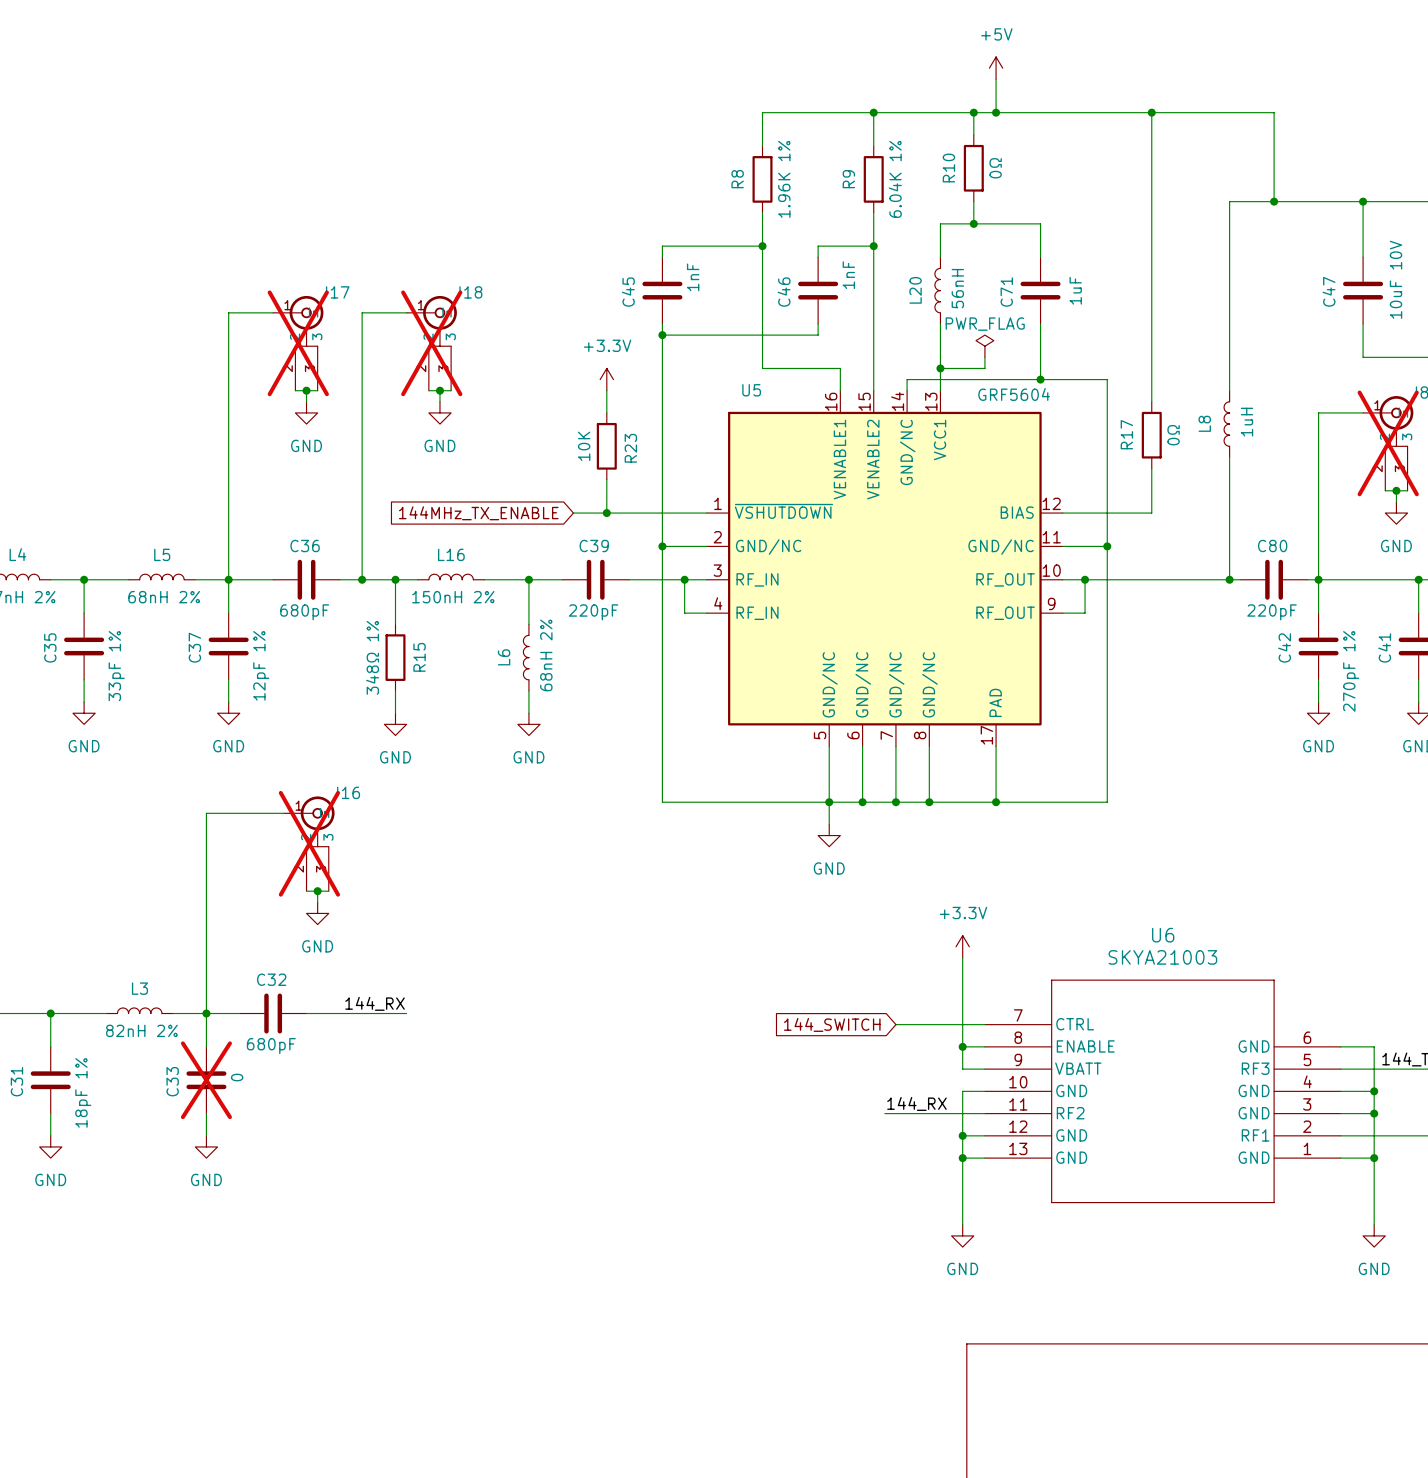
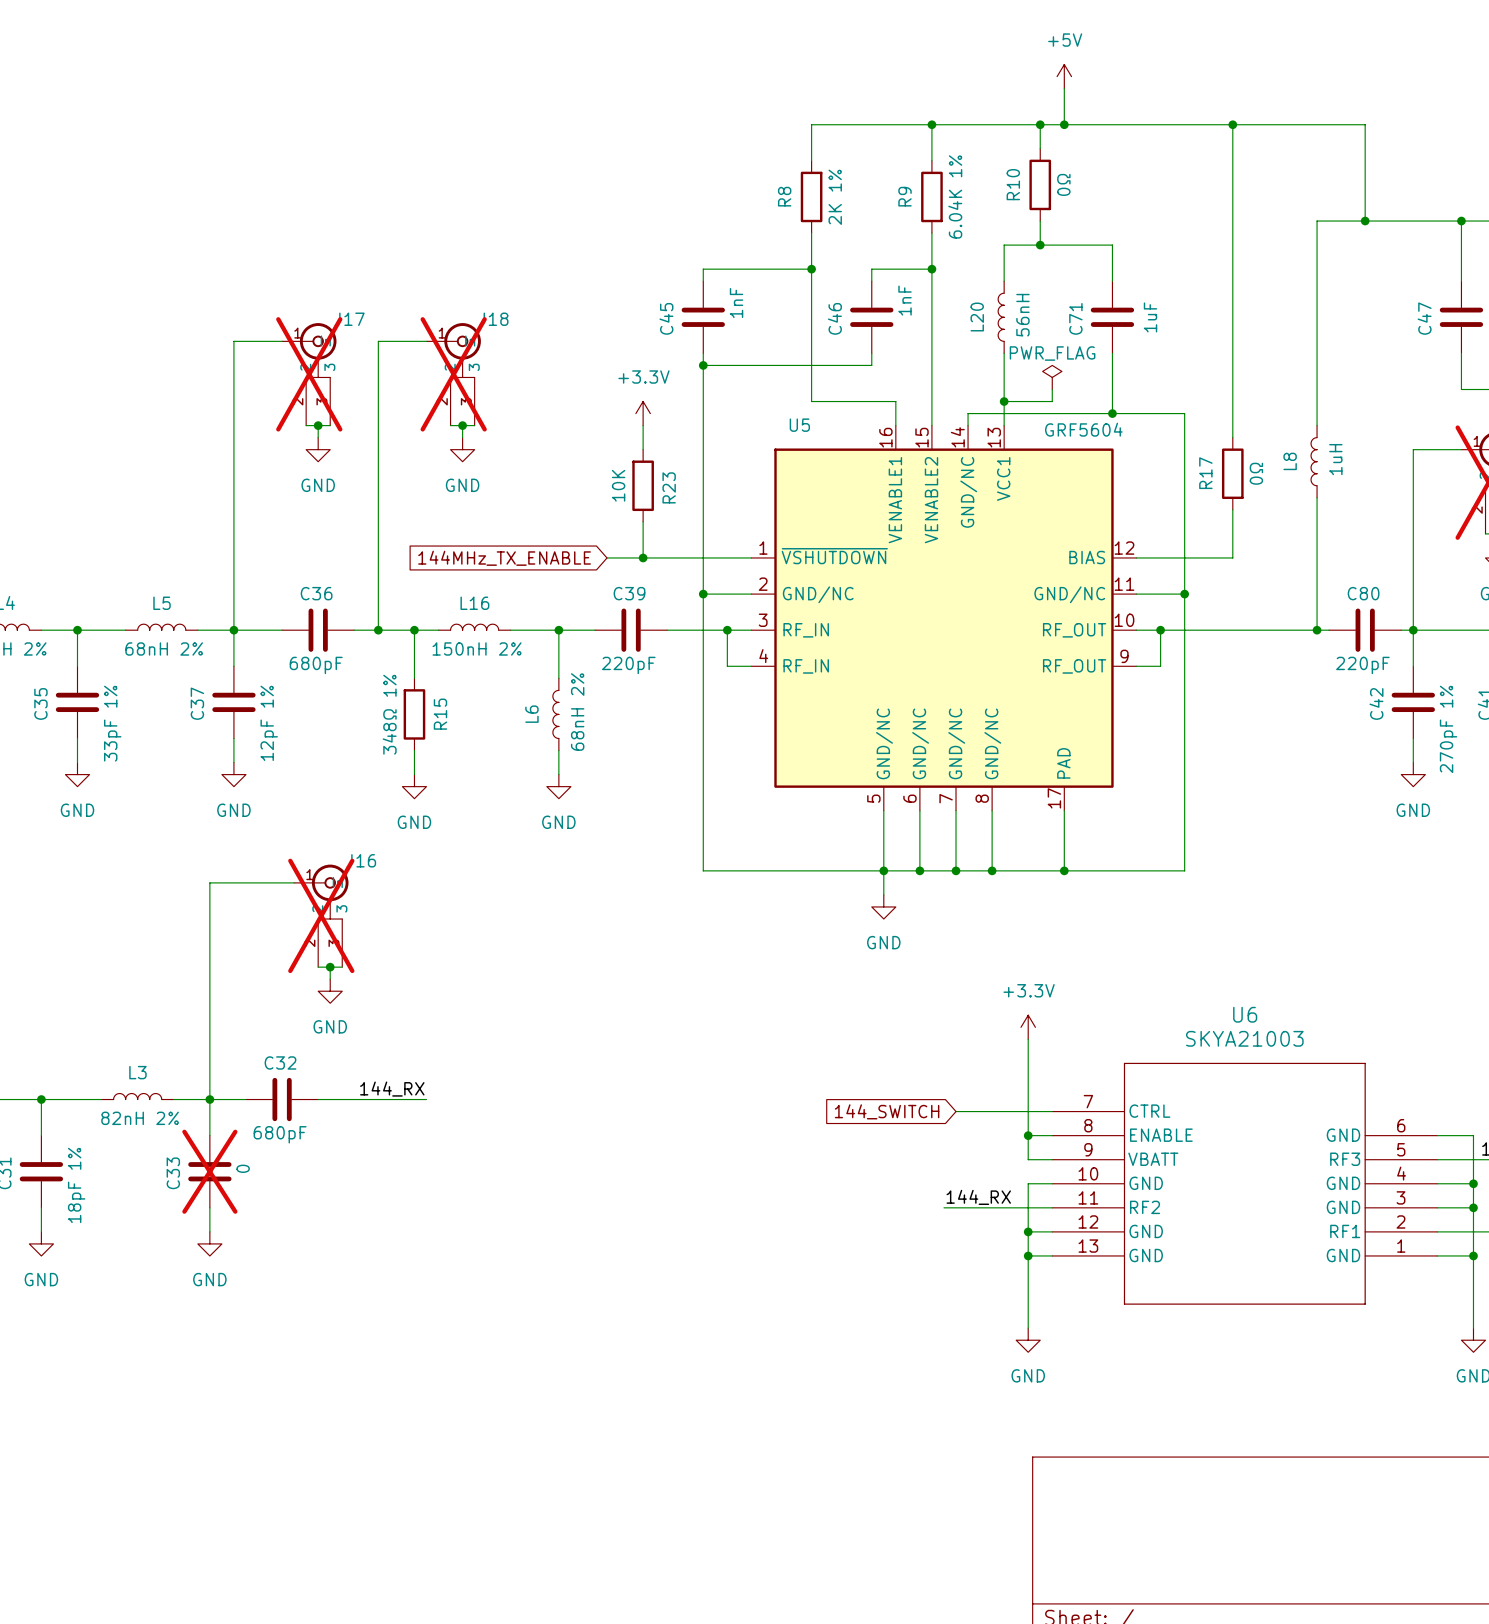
R8 value: 1.96K 1% (784, 179) -> 2K 1% (835, 197)

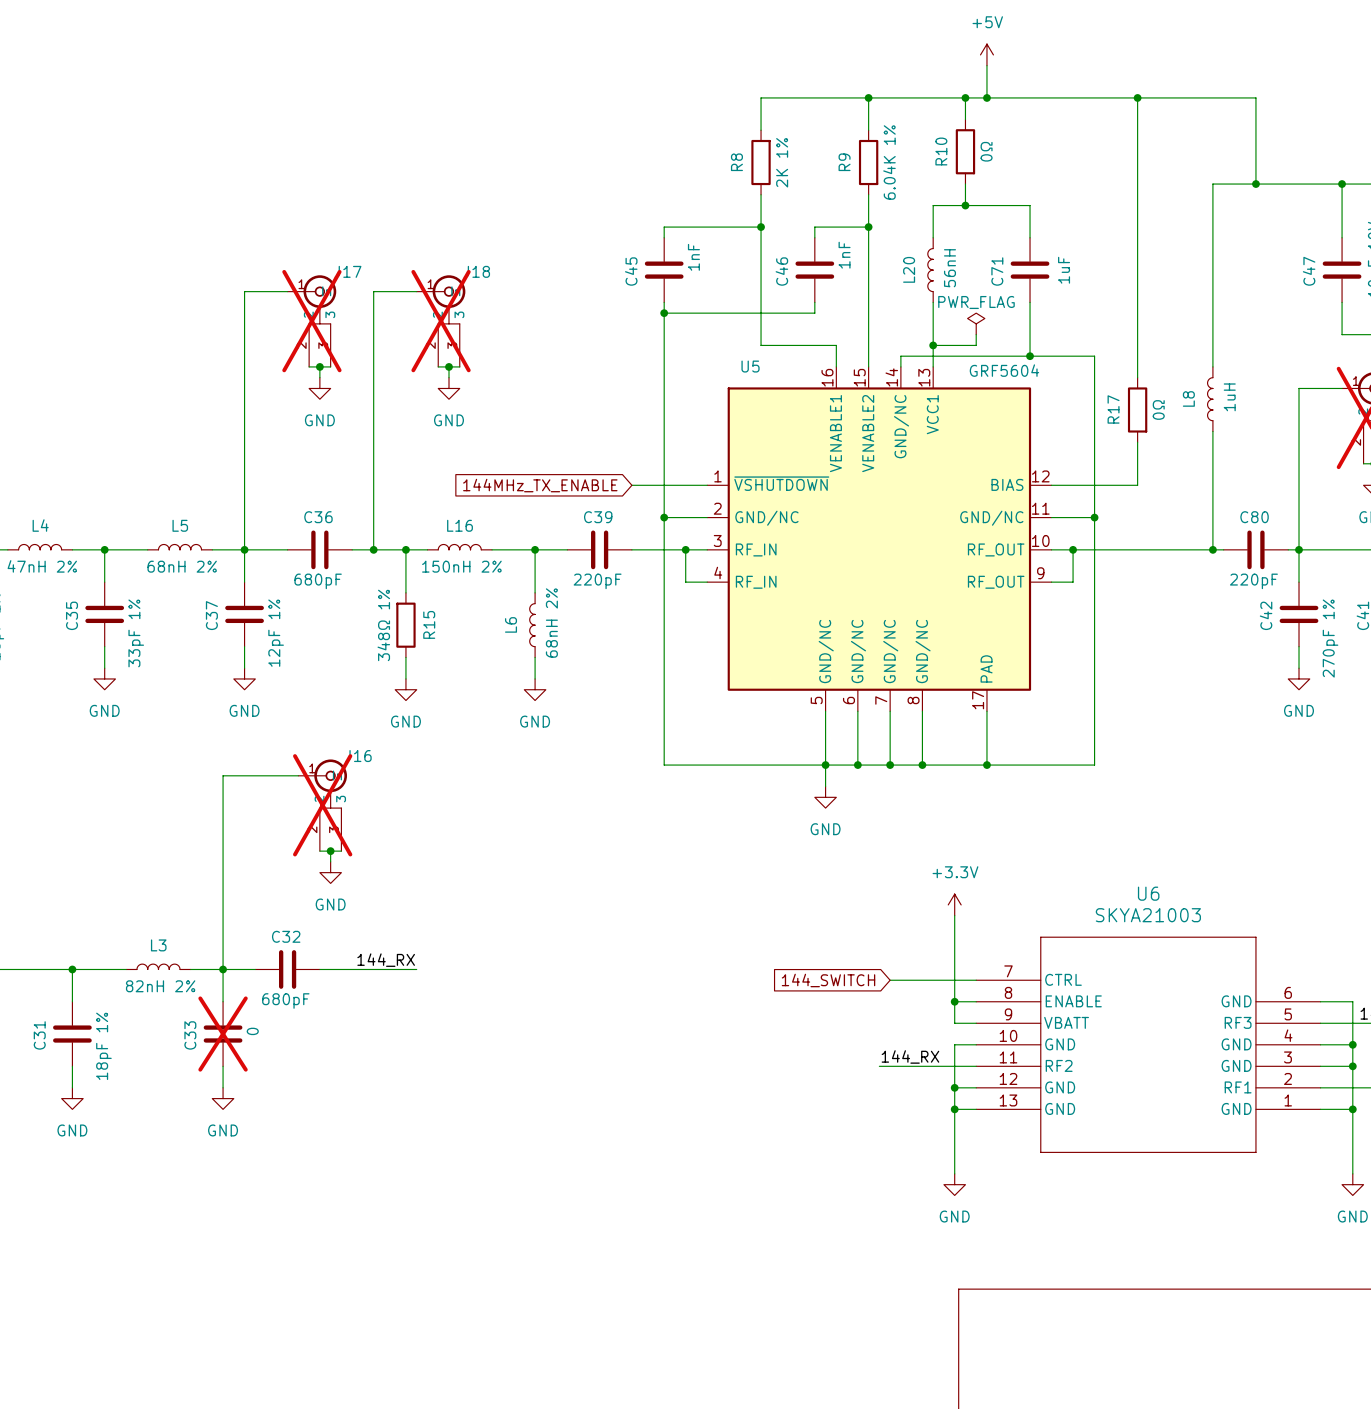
power symbol: +3.3V (643, 413) -> none
wire: (643, 425) (643, 449) -> none
R23: 10K (643, 485) -> none
wire: (643, 521) (643, 557) -> none
wire: (607, 557) (667, 557) -> none
junction: (643, 557) -> none
global label position: 144MHz_TX_ENABLE (504, 558) -> 144MHz_TX_ENABLE (540, 485)

